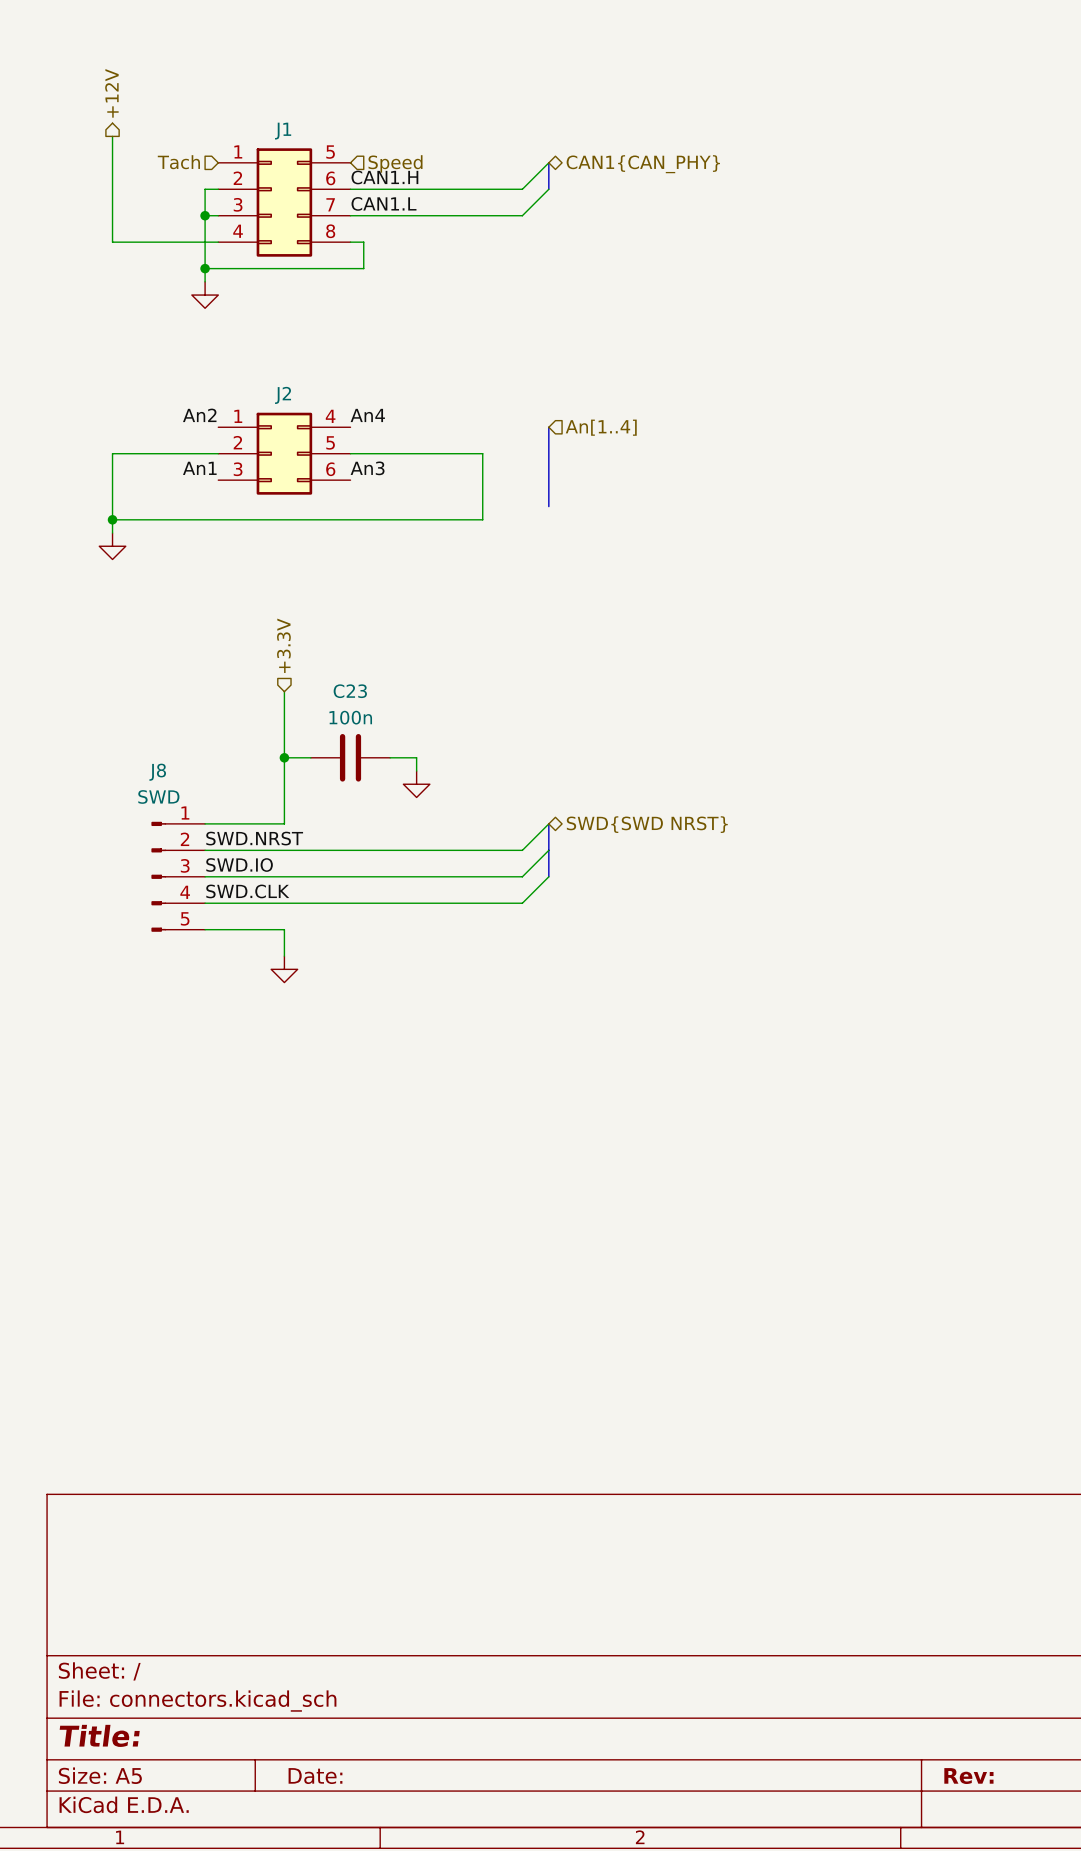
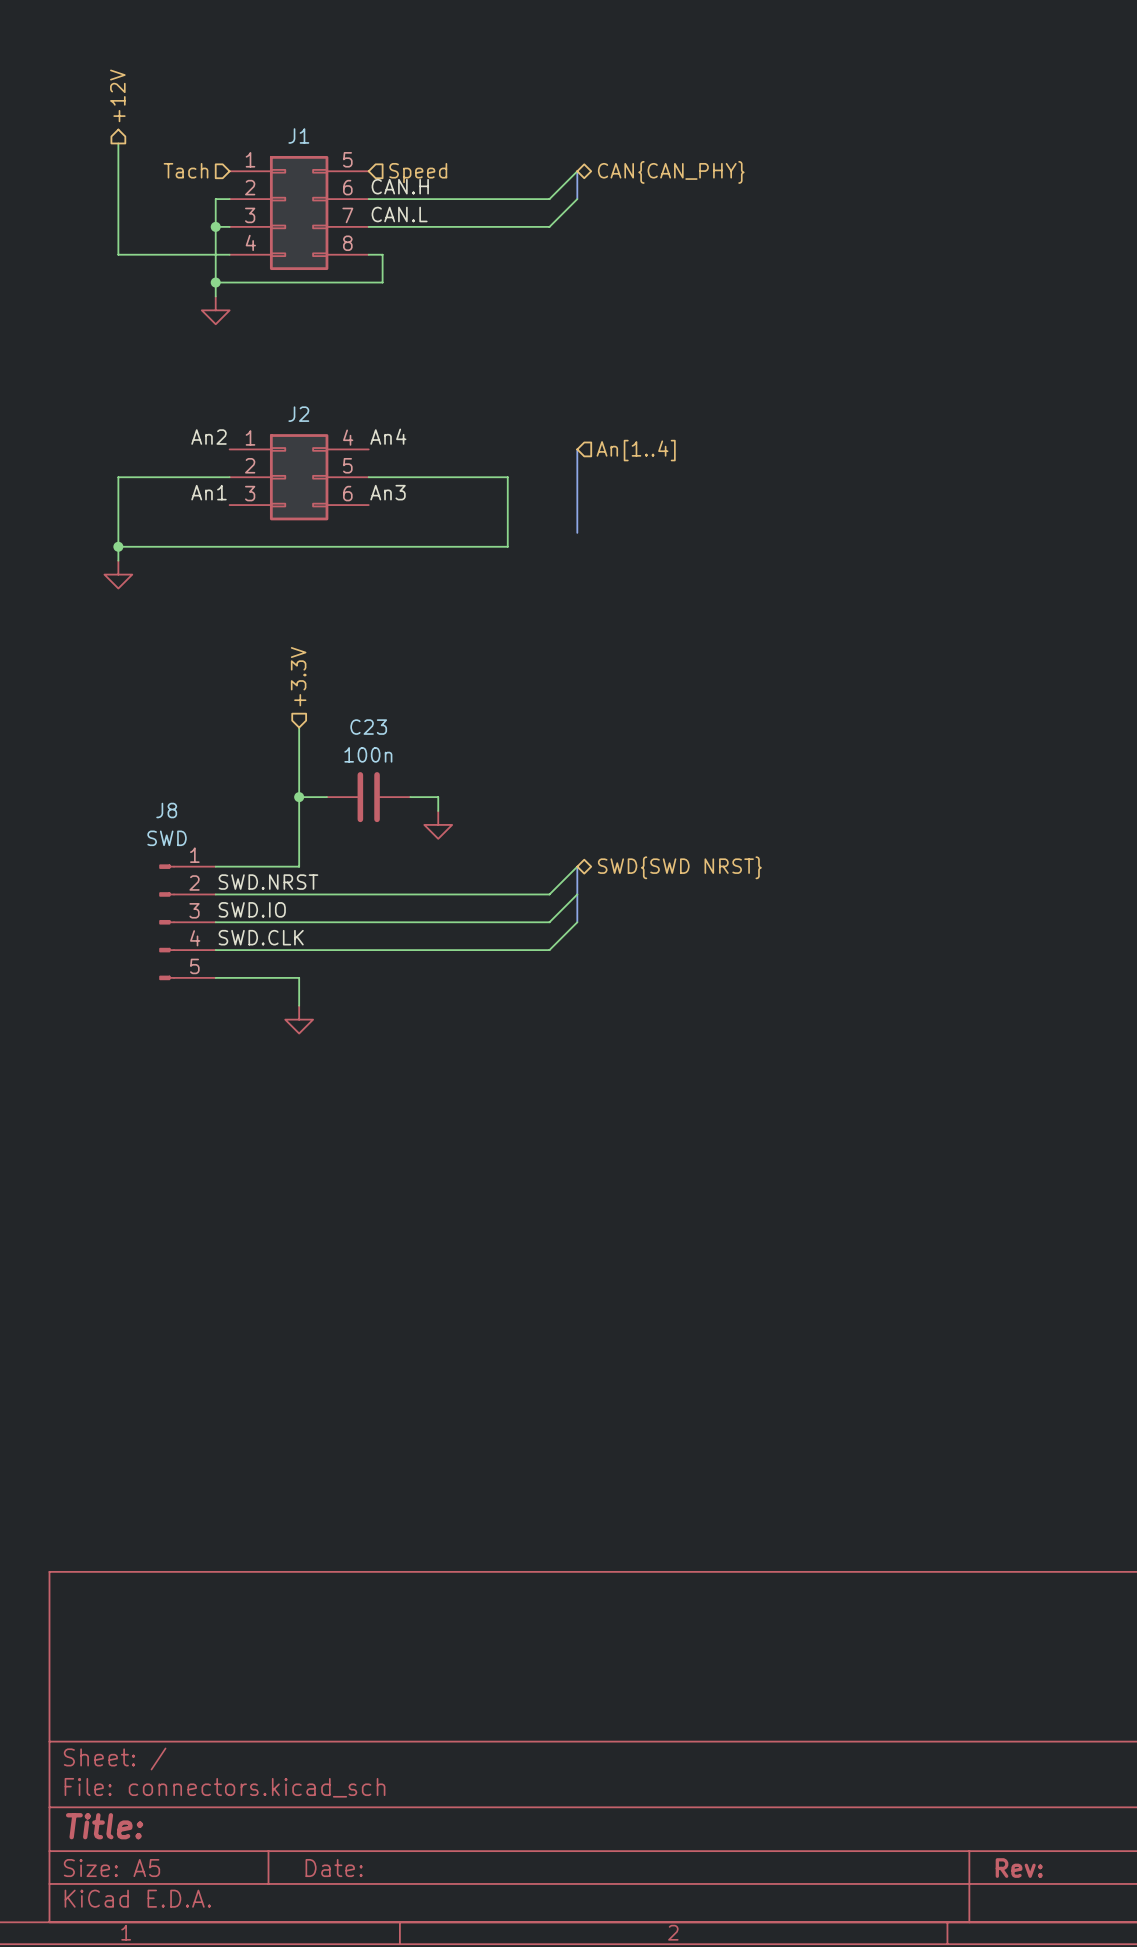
hierarchical label: CAN1{CAN_PHY} (643, 164) -> CAN{CAN_PHY} (671, 172)
label: CAN1.H (384, 177) -> CAN.H (400, 186)
label: CAN1.L (383, 203) -> CAN.L (399, 214)

